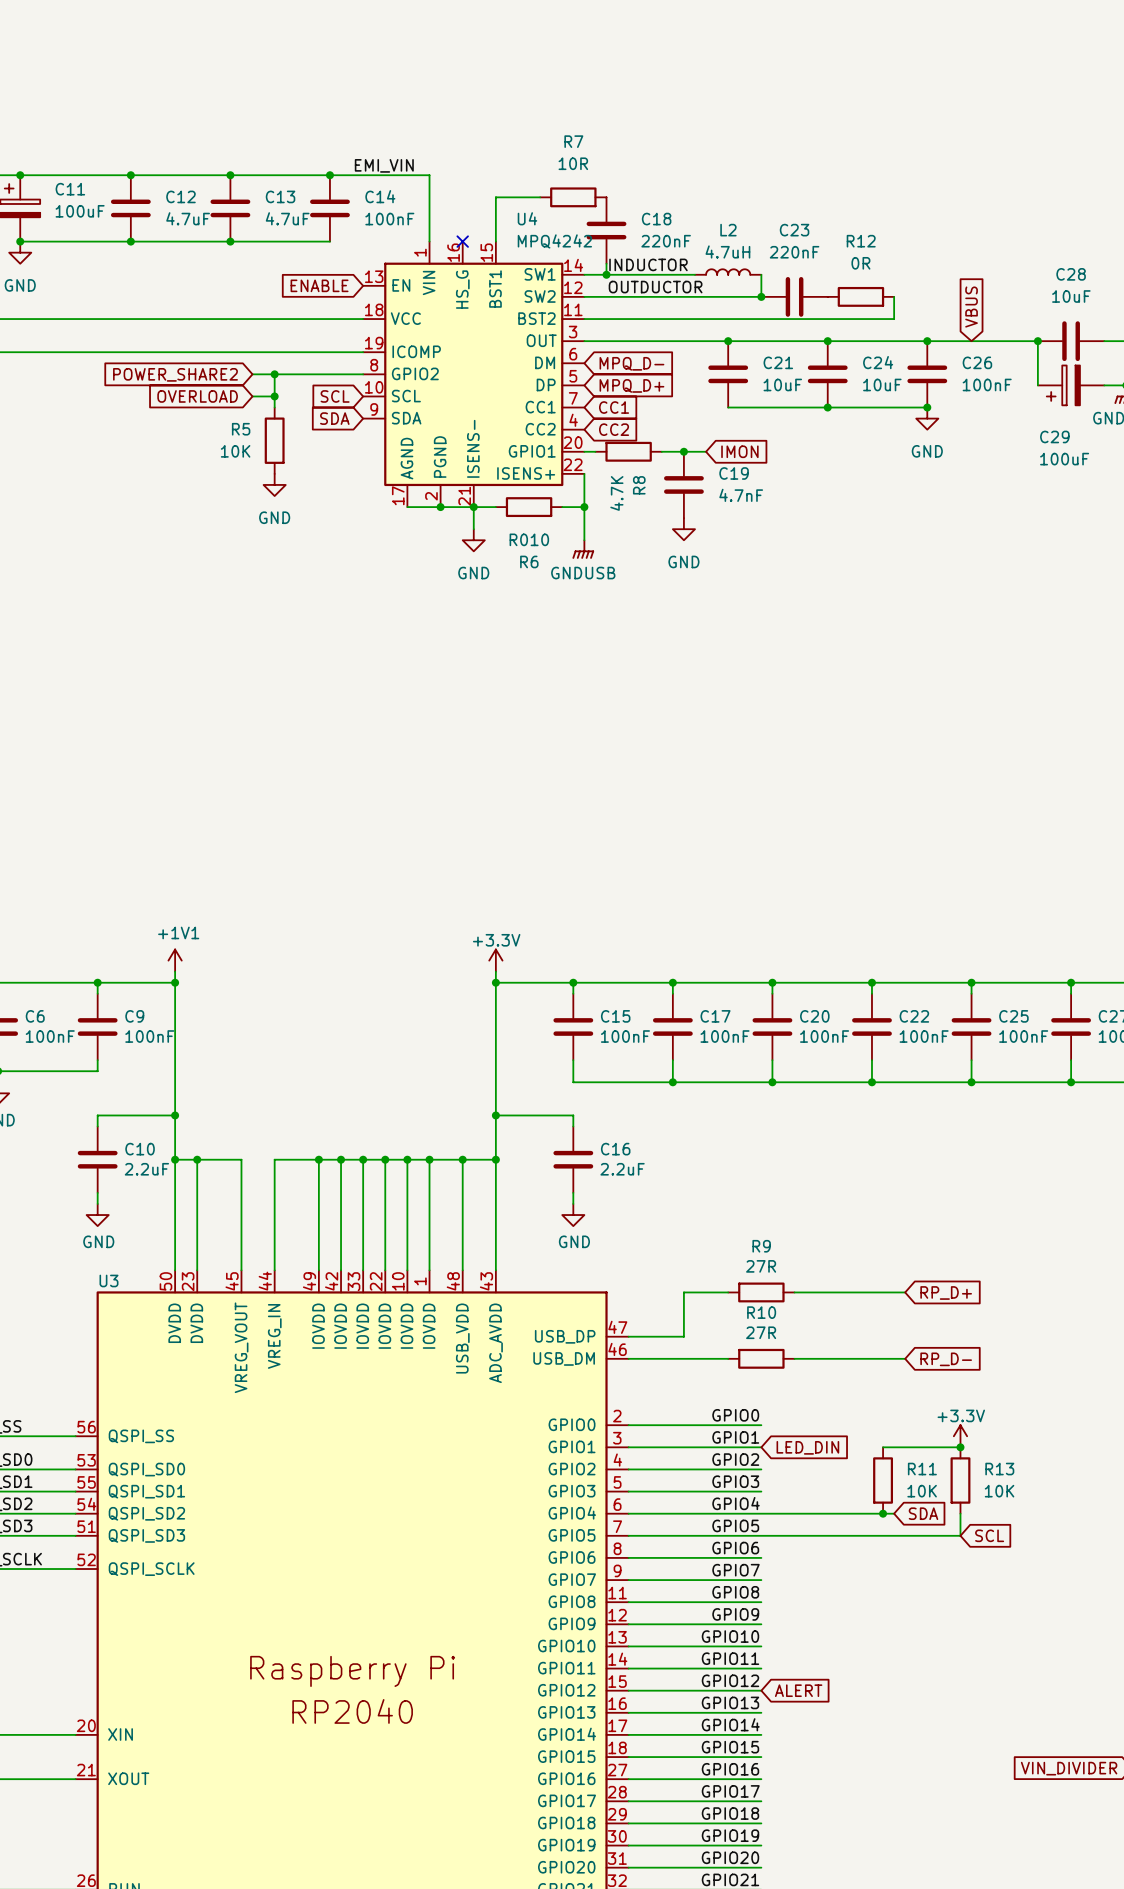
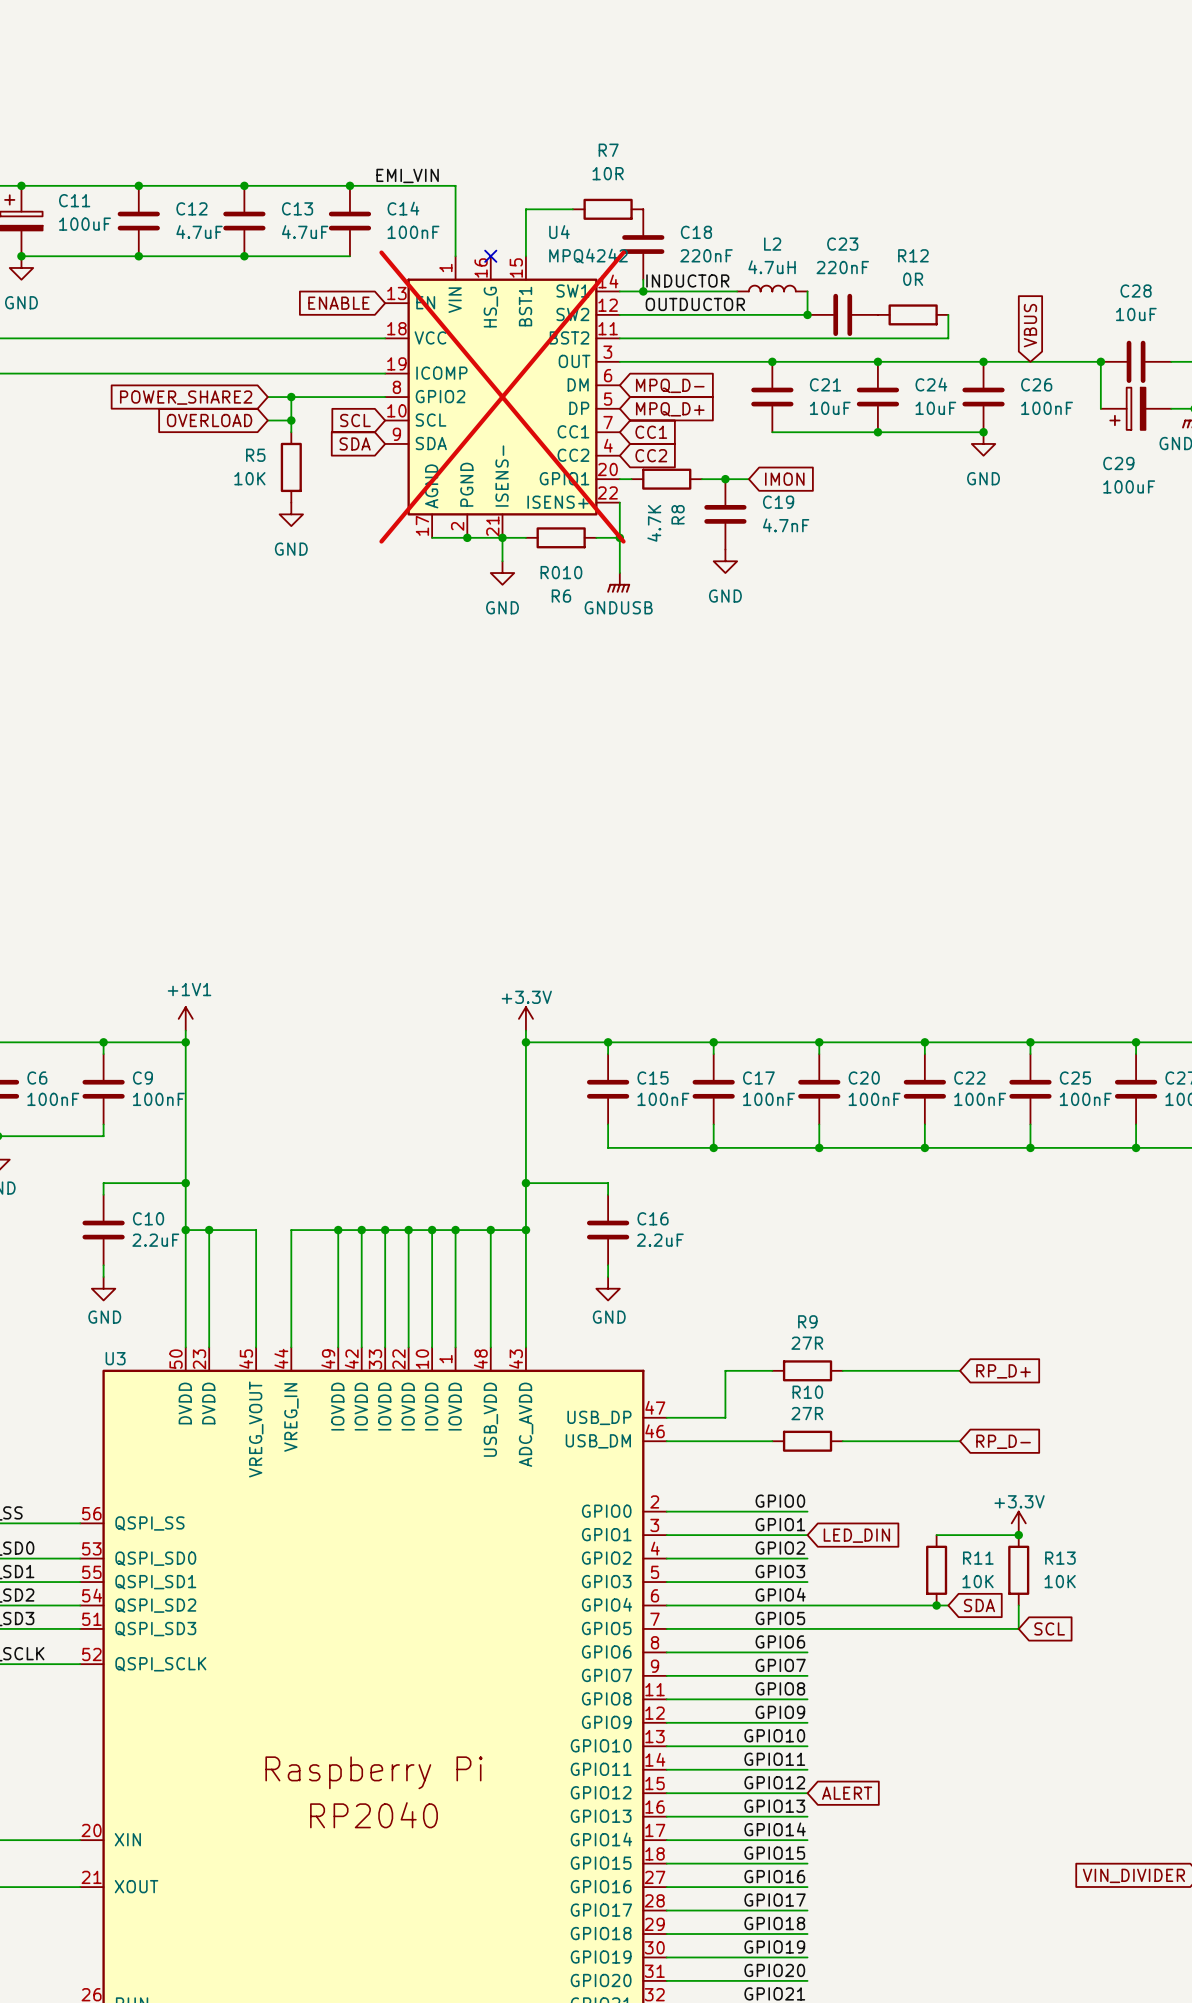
U4 do-not-place cross: none -> (502, 397)

